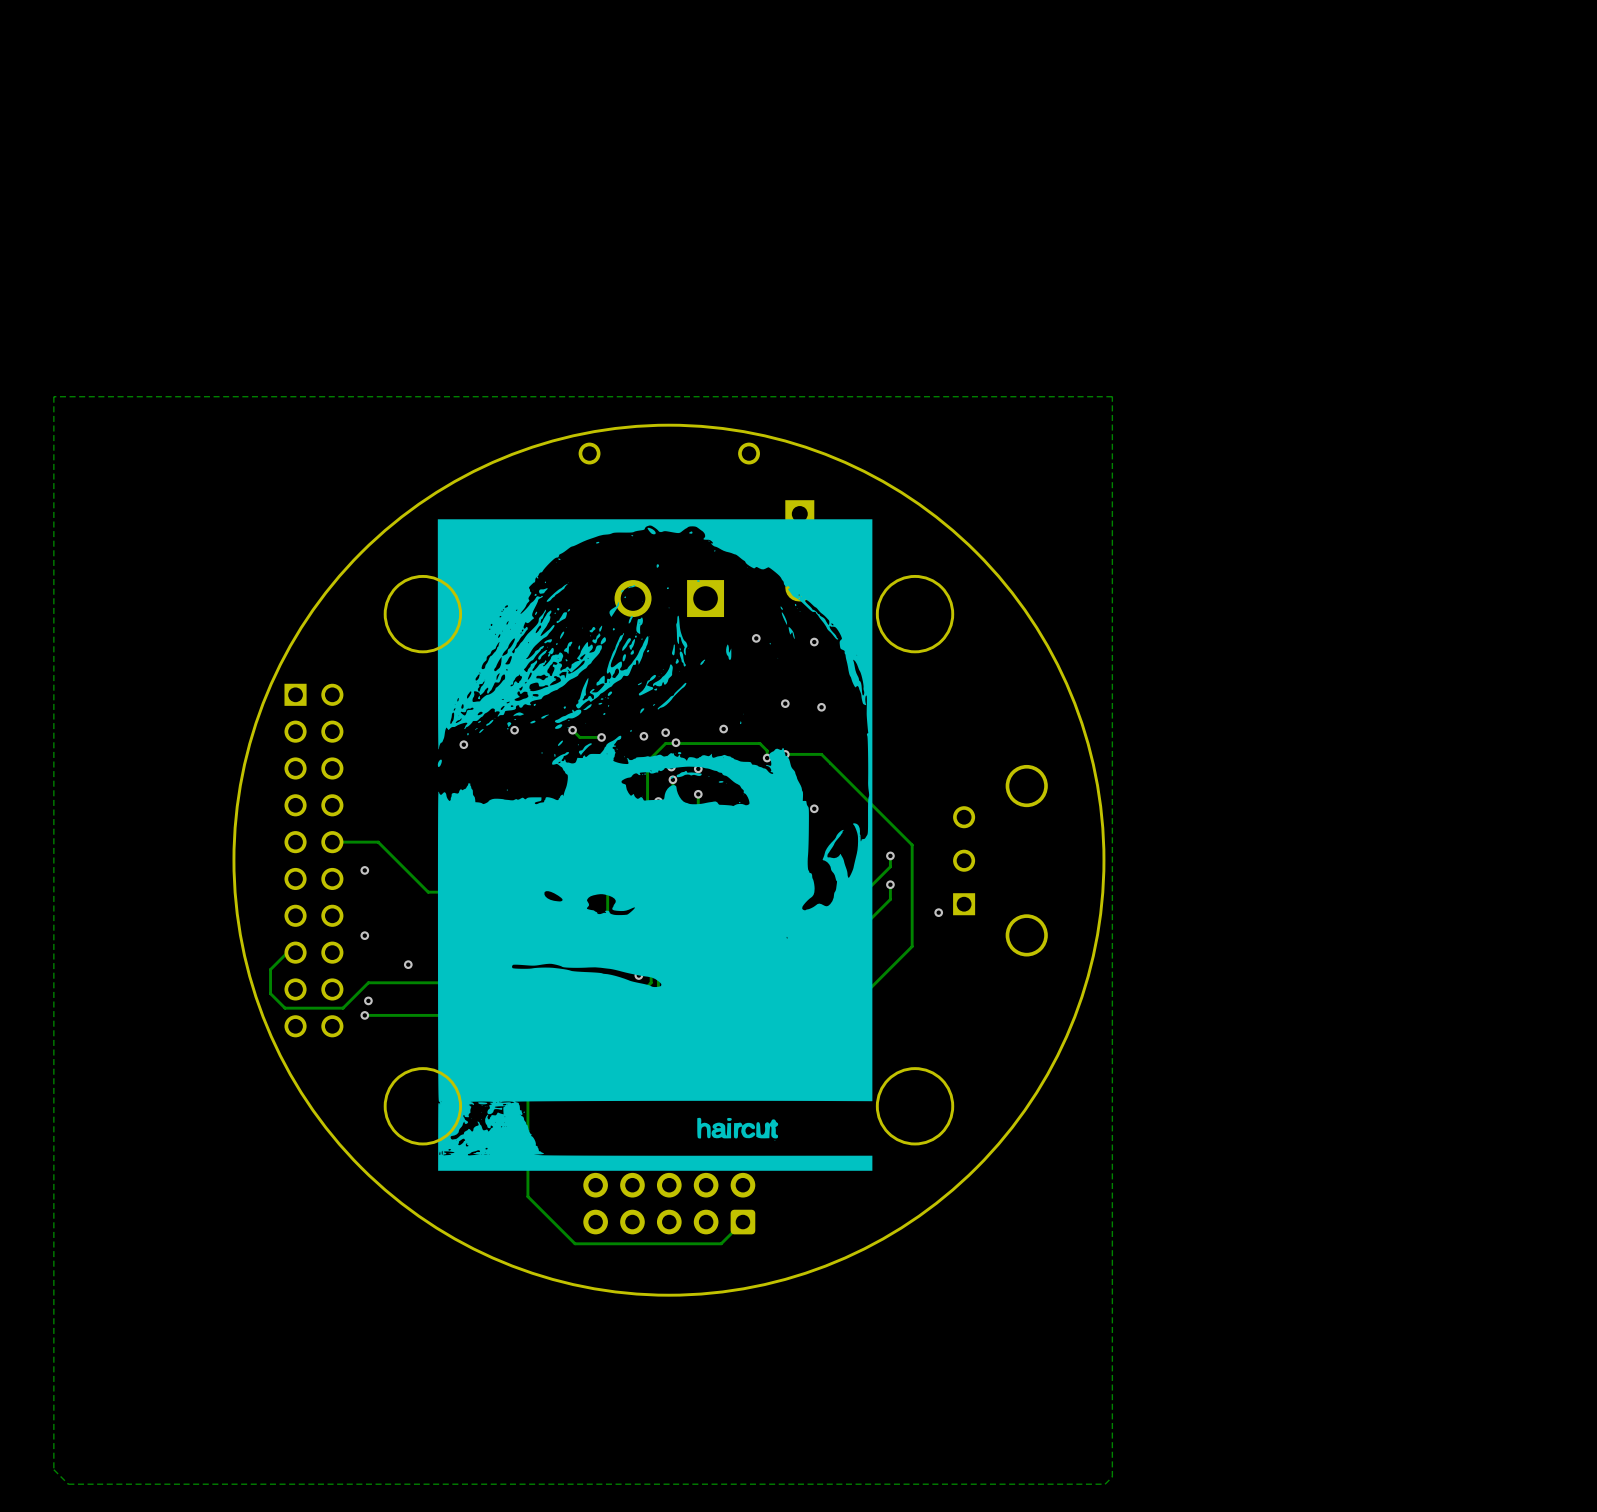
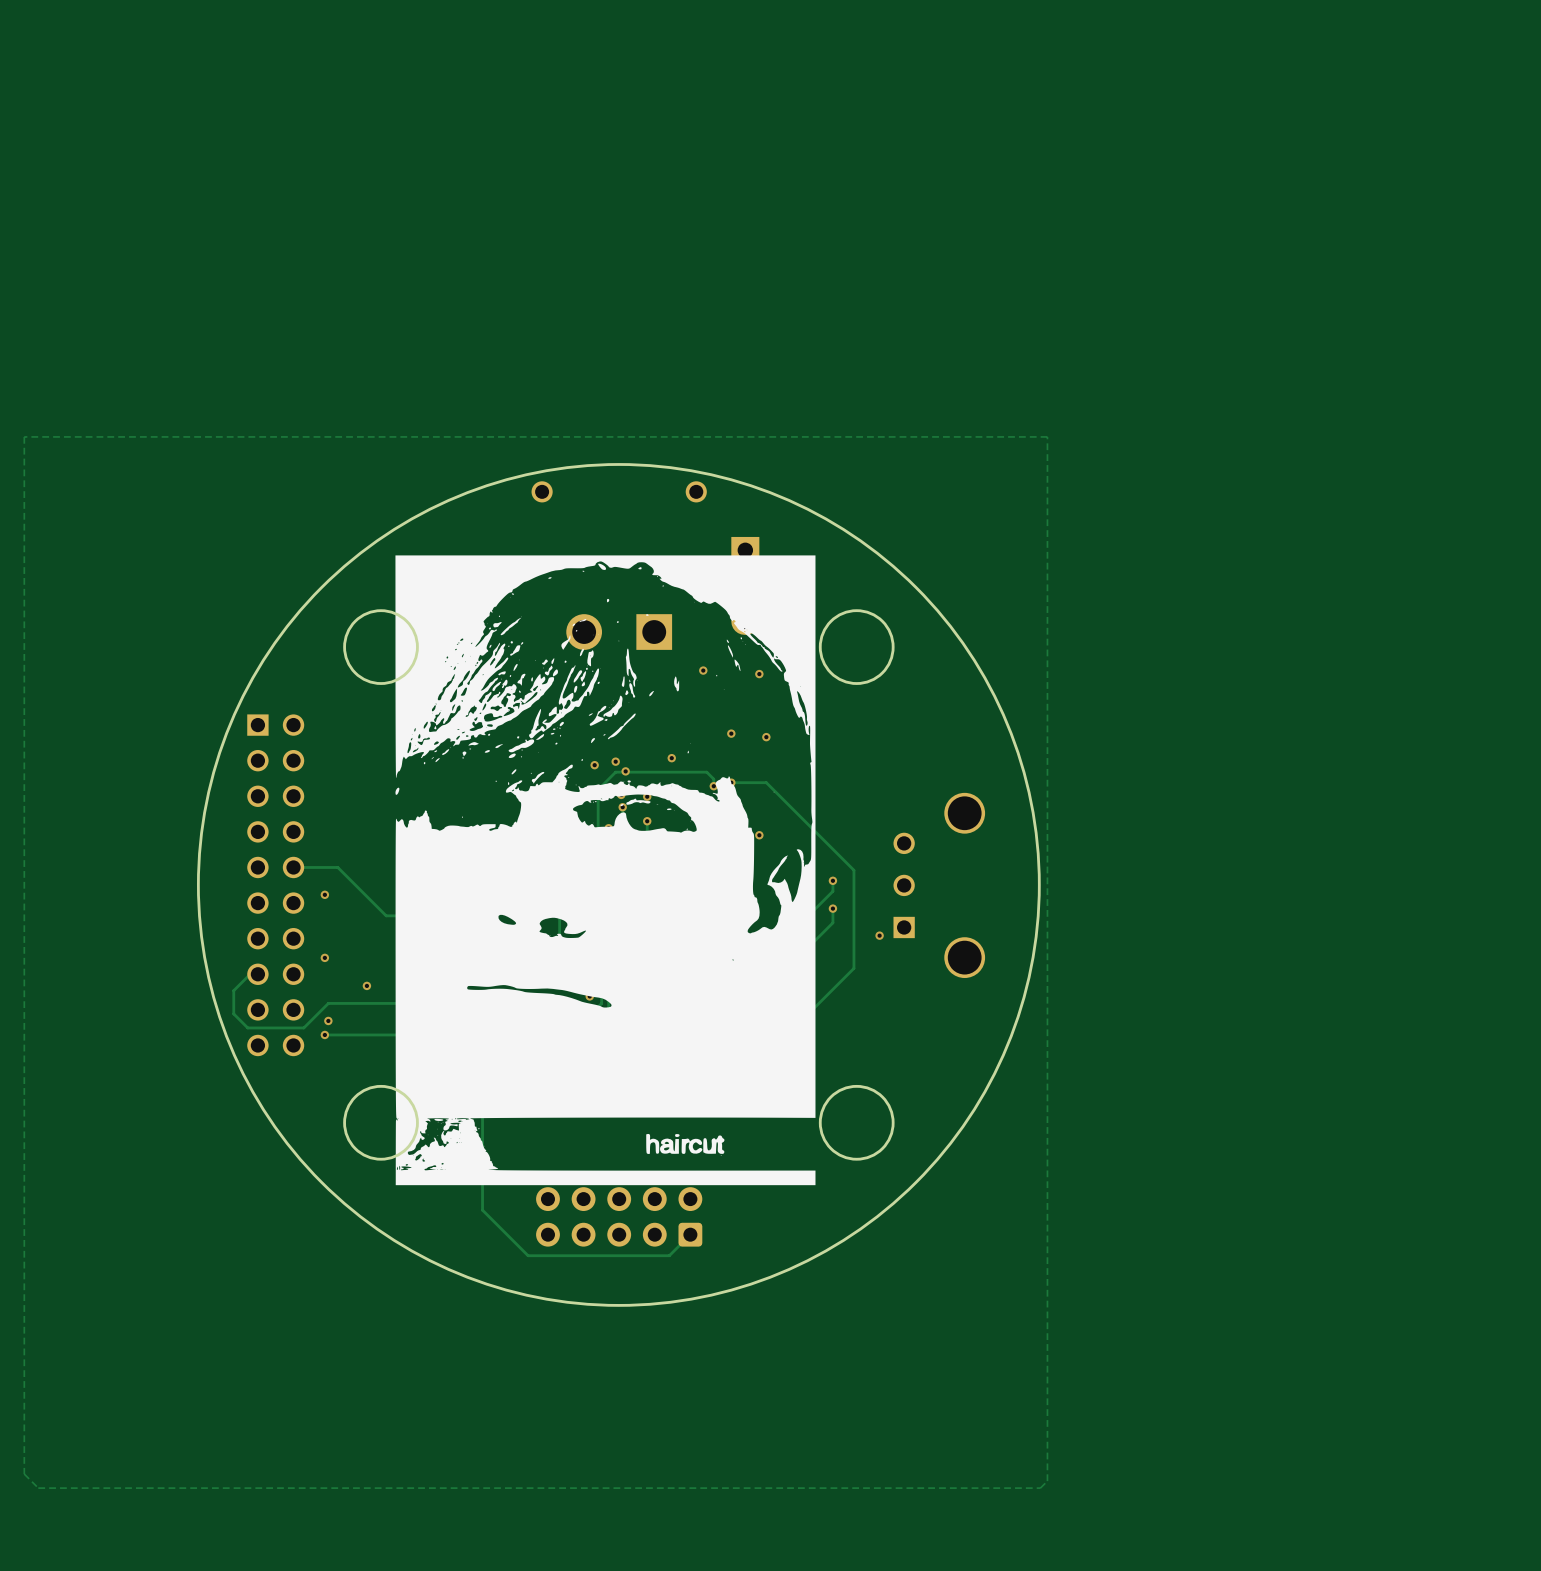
via: (514, 730) -> none
track: (572, 730) (579, 737) (601, 737) -> none
via: (572, 730) -> none
via: (601, 737) -> none
via: (463, 744) -> none

